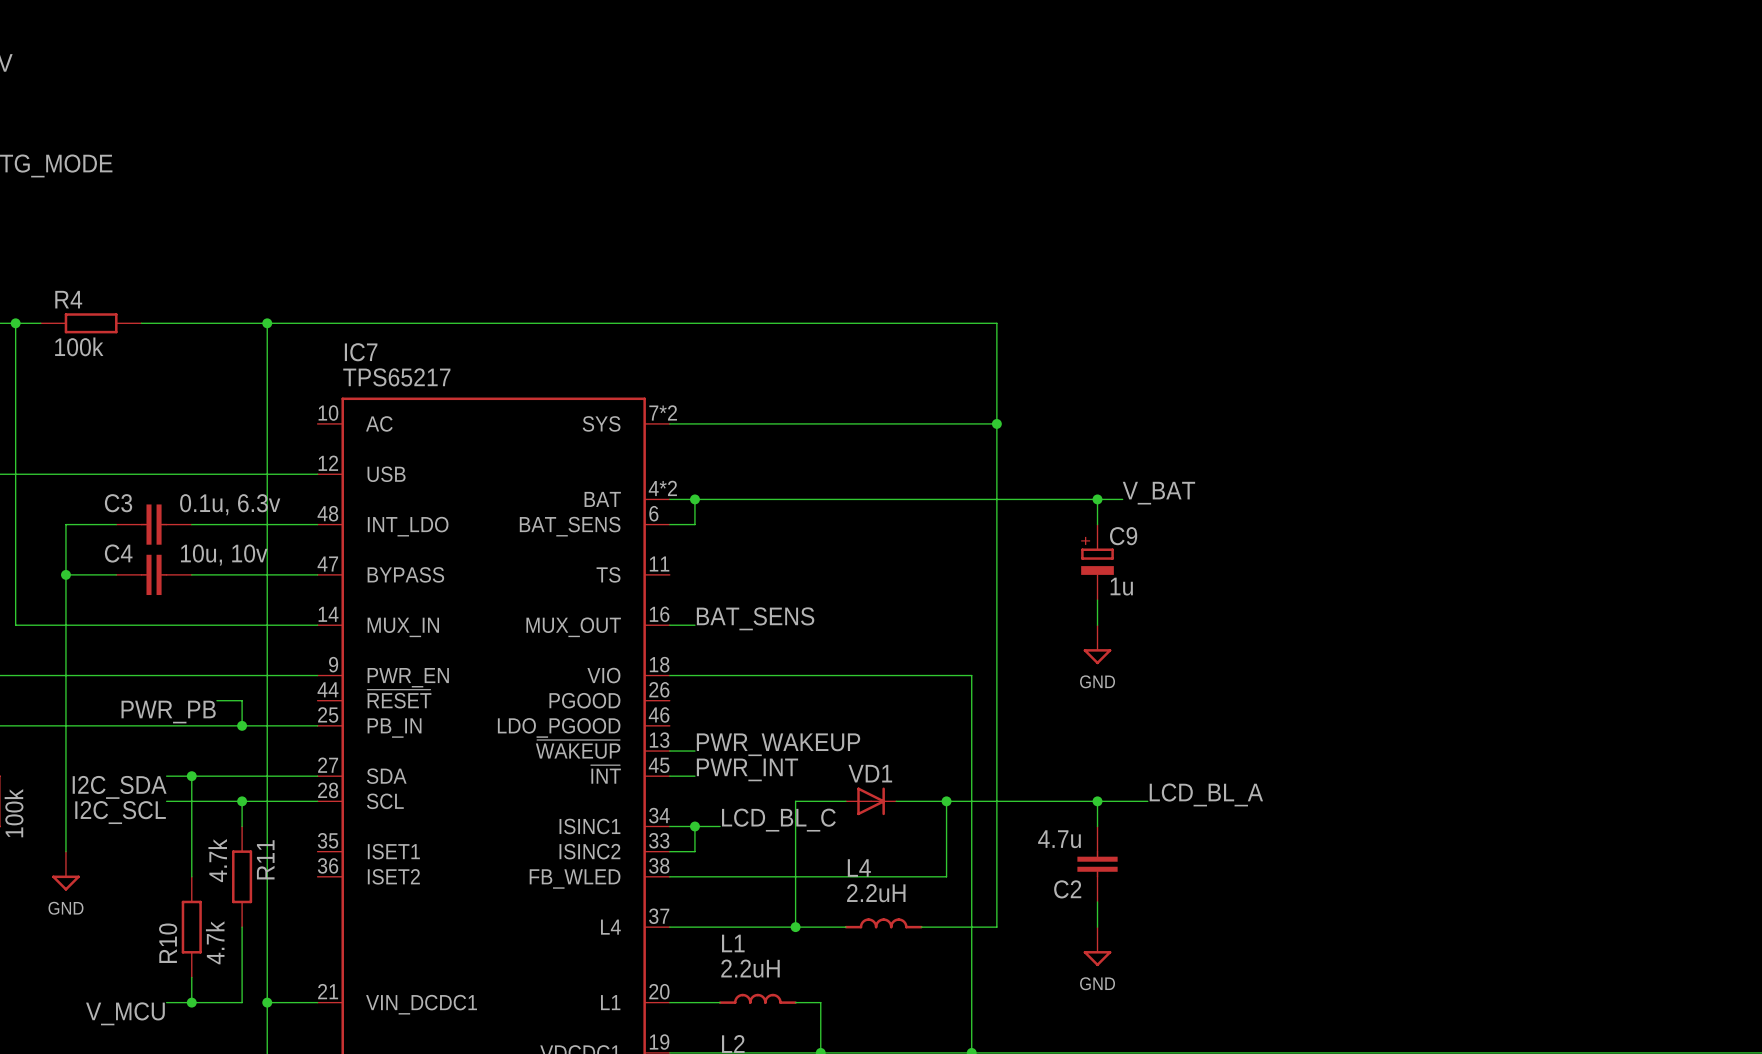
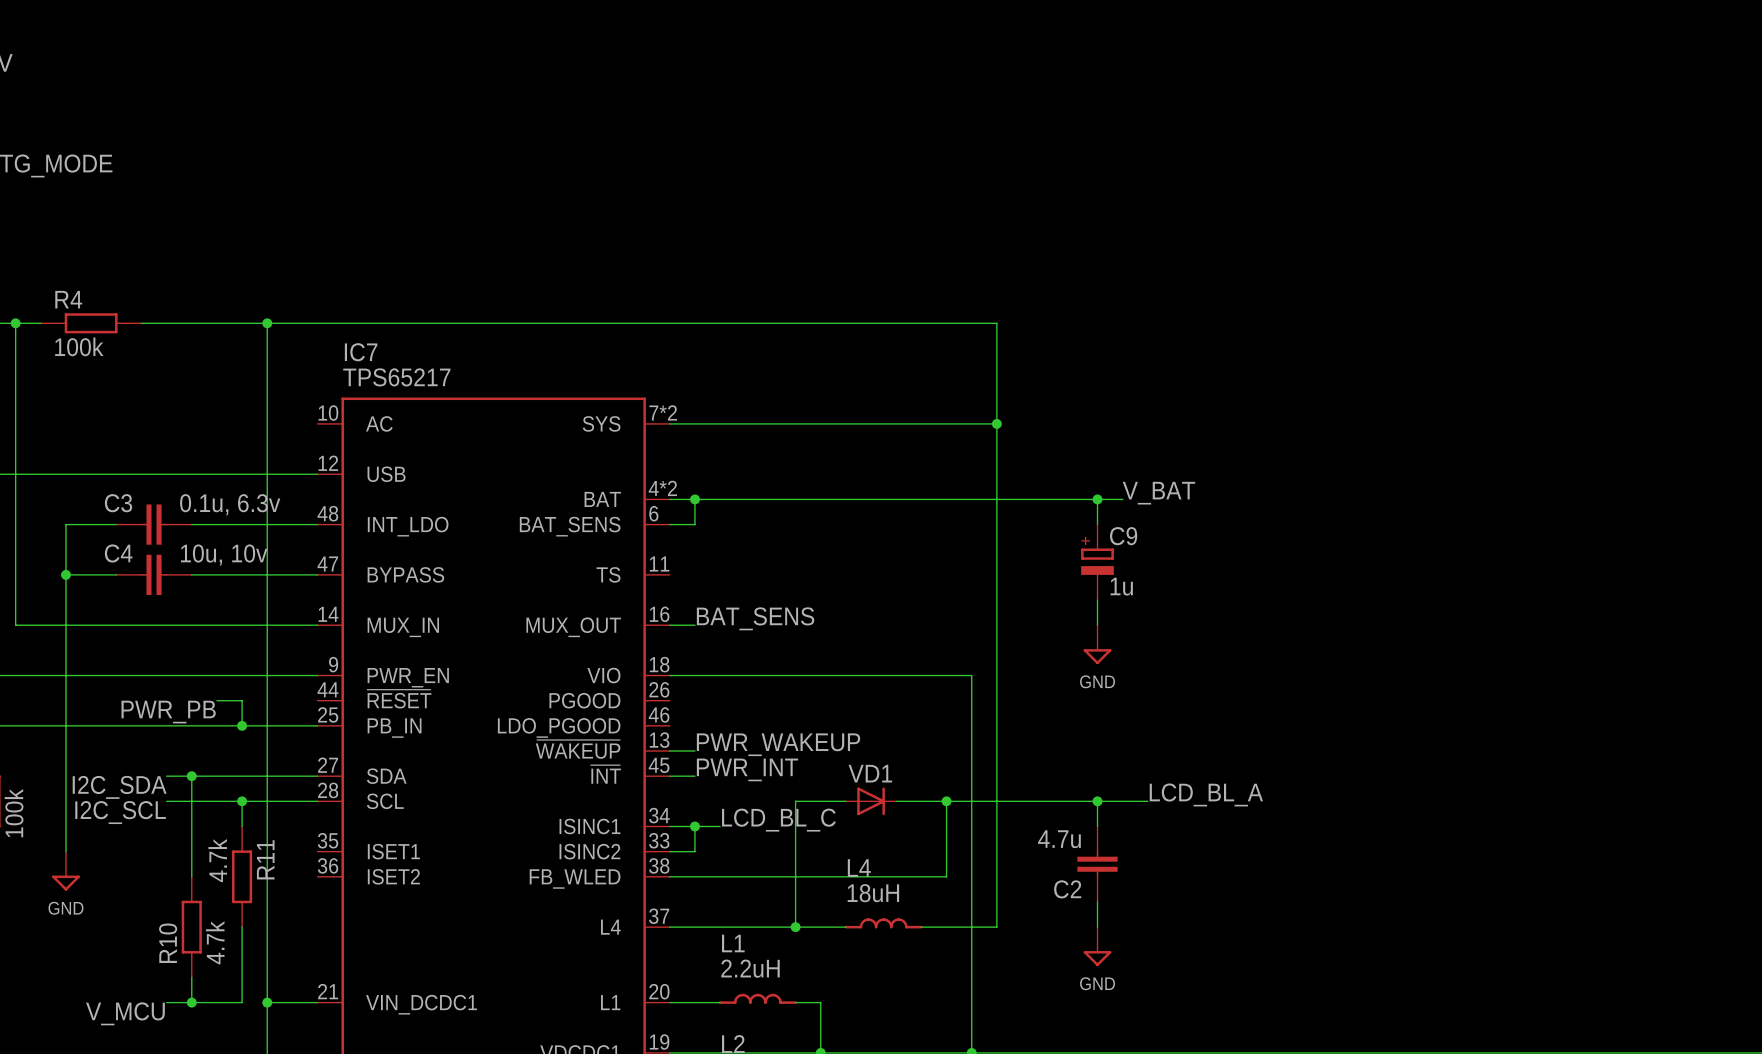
L4 value: 2.2uH (876, 893) -> 18uH (873, 893)

